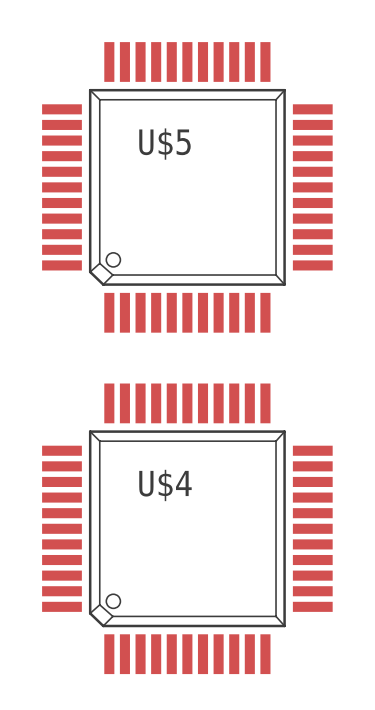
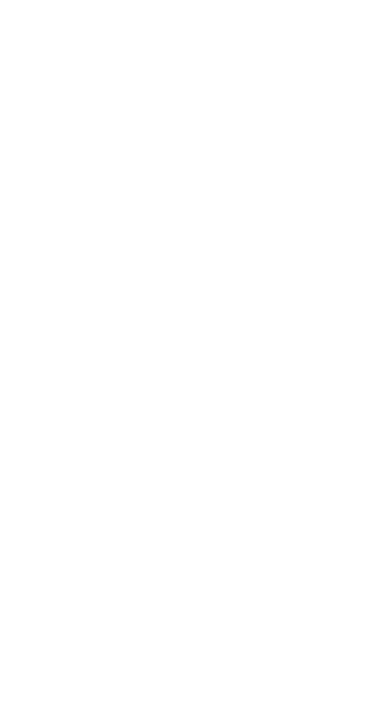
U$5: (187, 187) -> none
U$4: (187, 528) -> none

